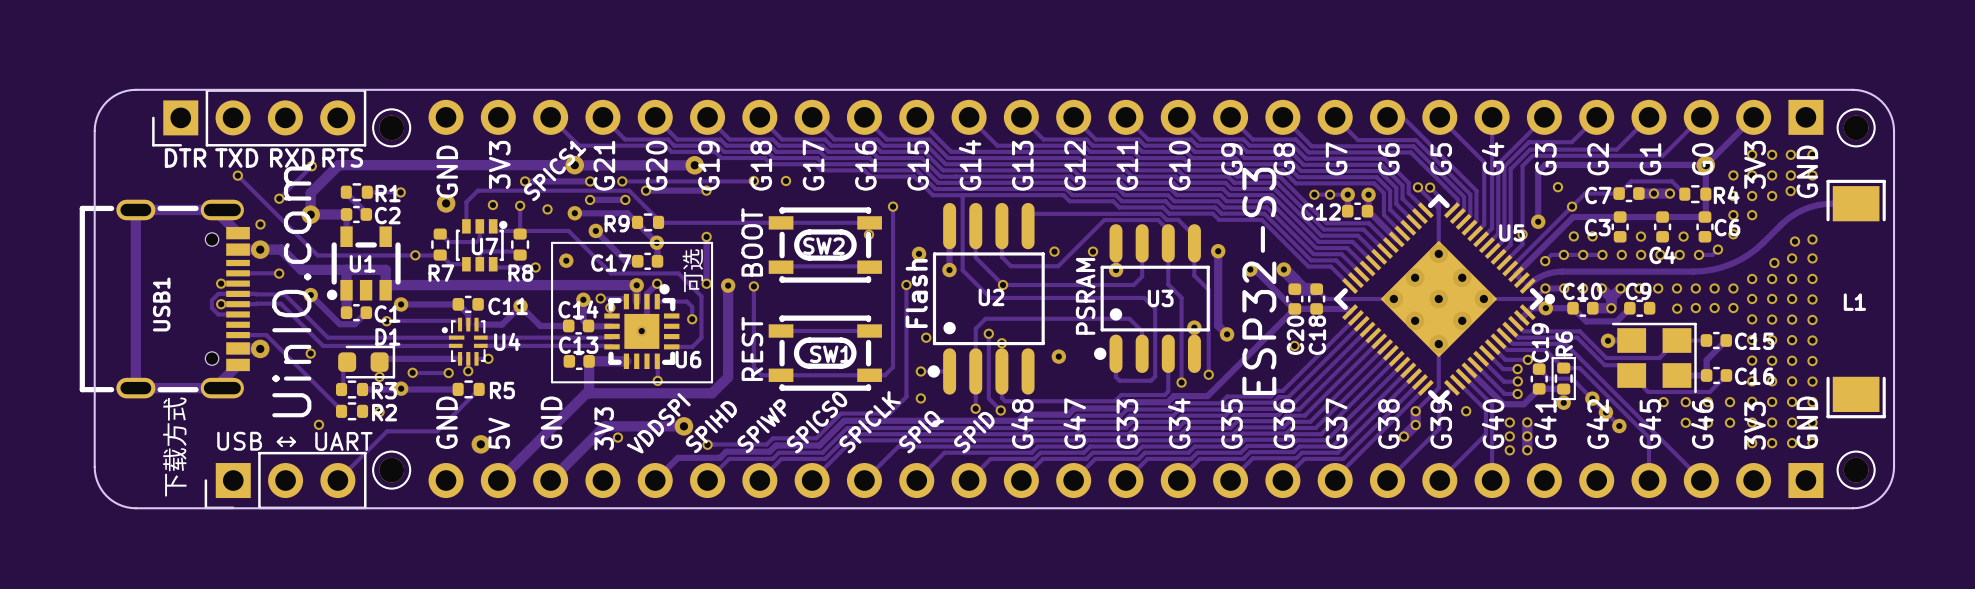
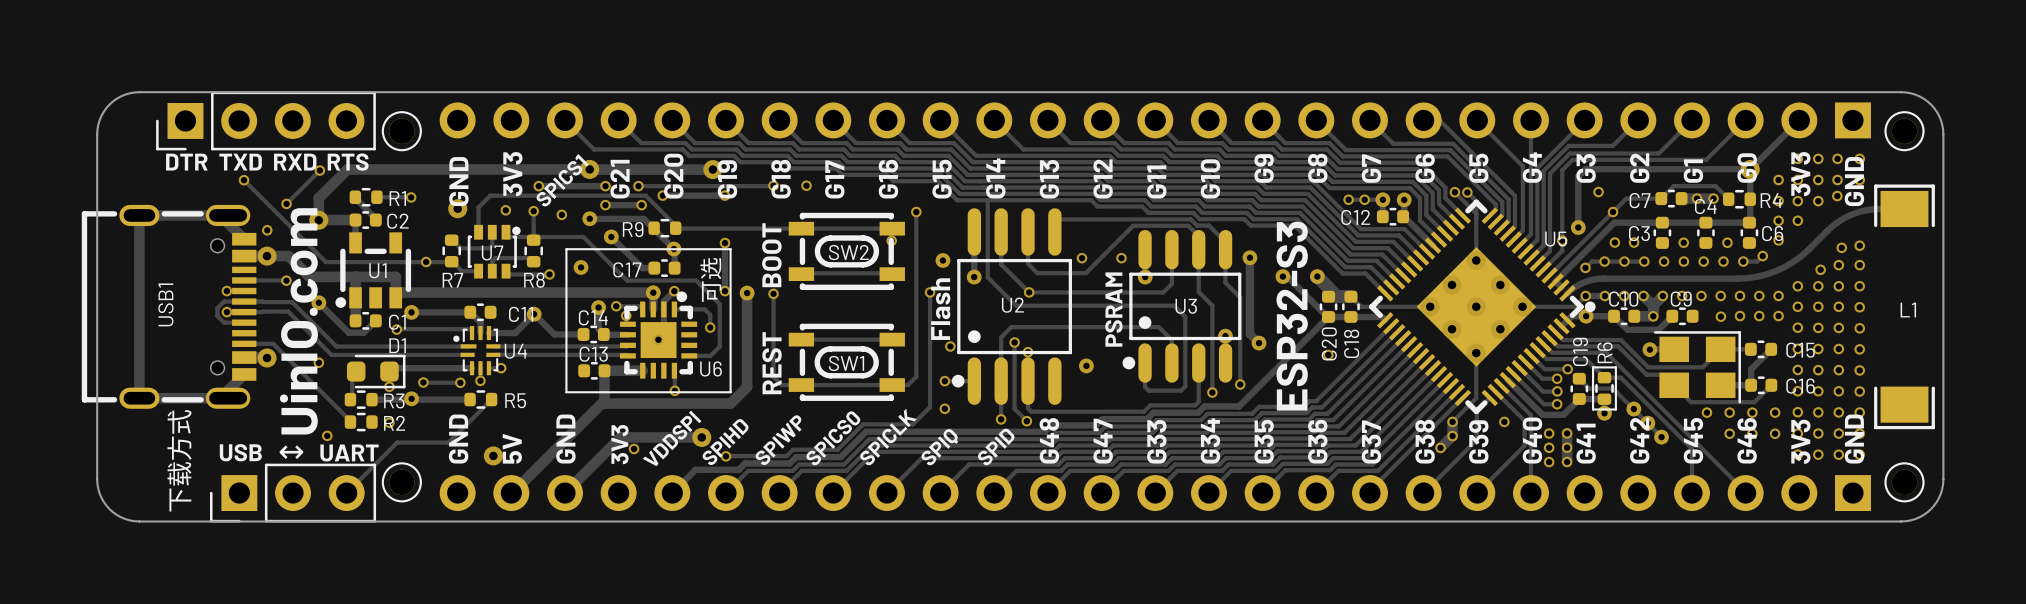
C4 name position: C4 (1662, 255) -> C4 (1705, 206)

